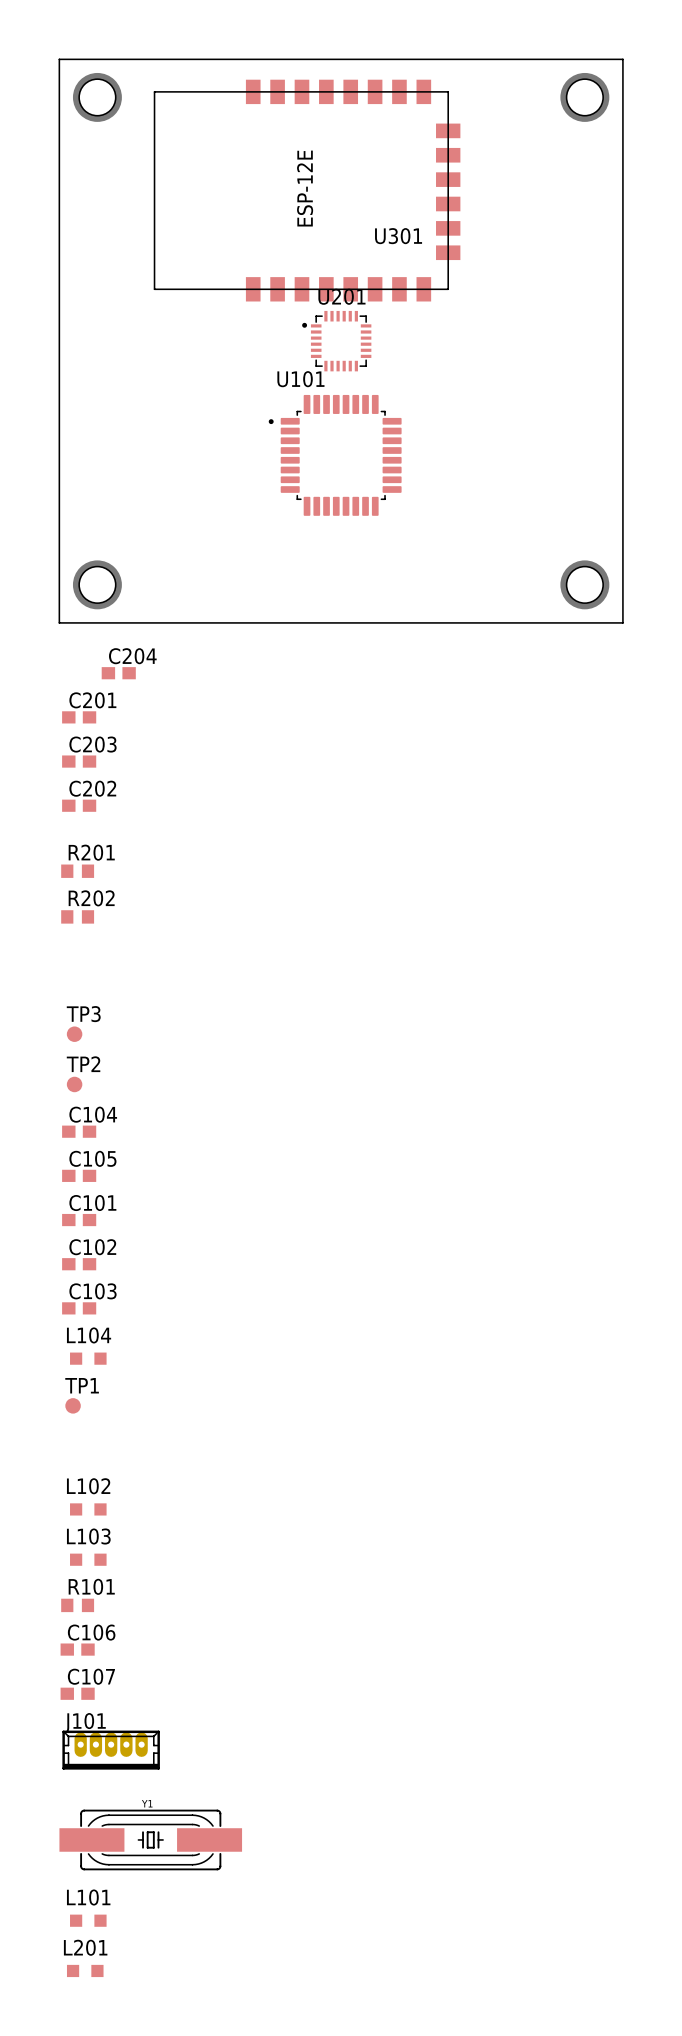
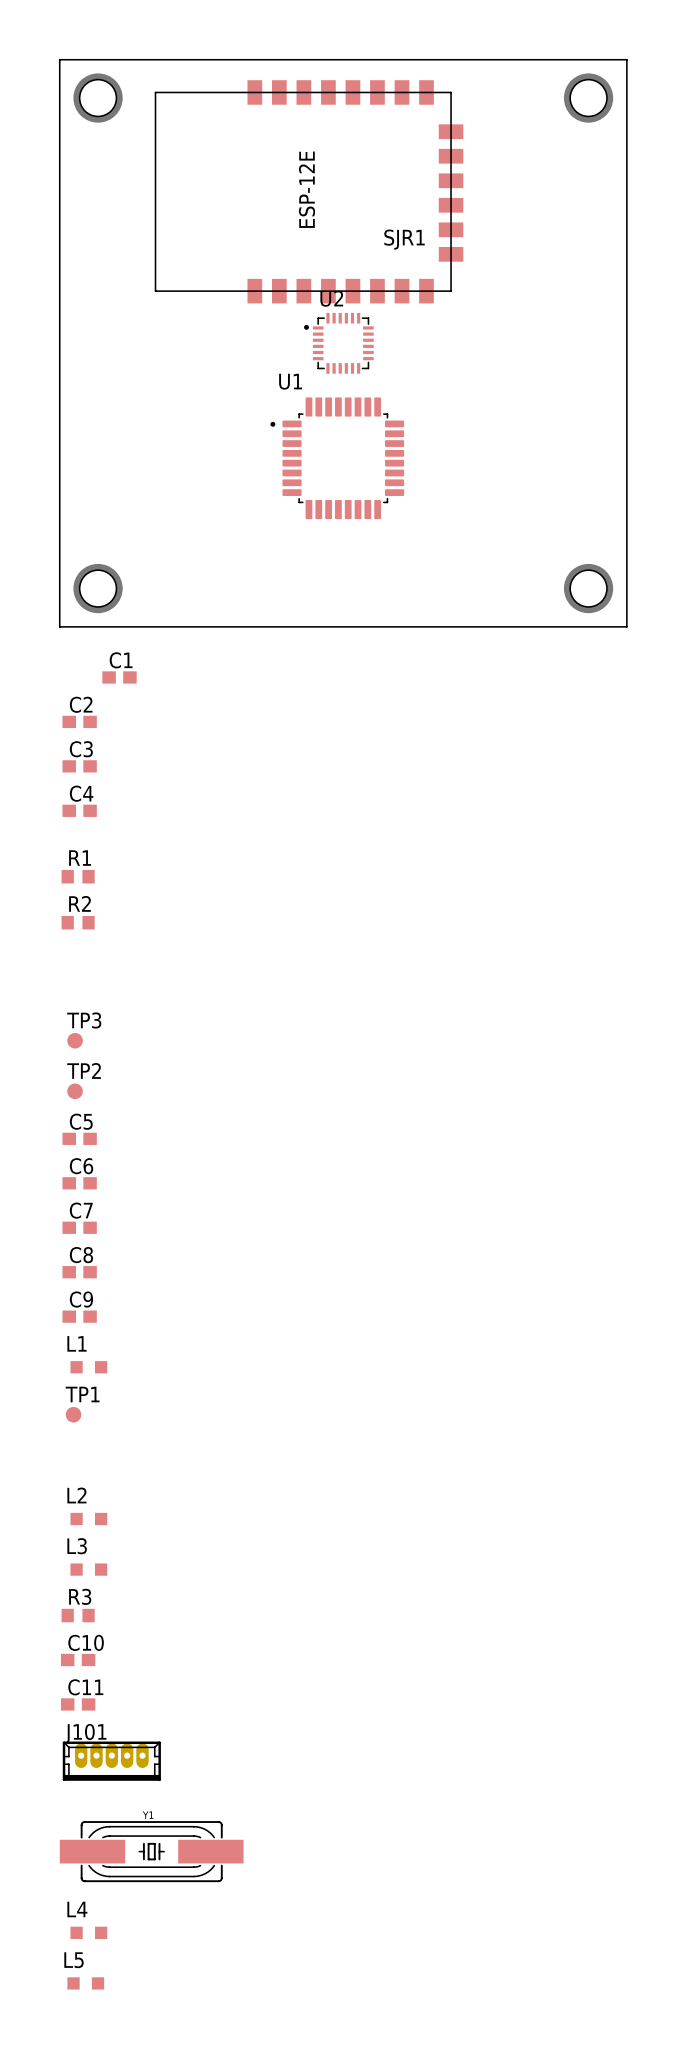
U301 name: U301 (398, 236) -> SJR1 (404, 239)
U201 name: U201 (341, 296) -> U2 (331, 298)
U101 name: U101 (300, 379) -> U1 (290, 381)
C204 name: C204 (132, 656) -> C1 (121, 660)
C201 name: C201 (92, 700) -> C2 (81, 704)
C203 name: C203 (92, 744) -> C3 (81, 749)
C202 name: C202 (92, 788) -> C4 (81, 793)
R201 name: R201 (91, 852) -> R1 (80, 858)
R202 name: R202 (91, 898) -> R2 (80, 903)
C104 name: C104 (93, 1114) -> C5 (81, 1121)
C105 name: C105 (92, 1158) -> C6 (81, 1166)
C101 name: C101 (92, 1203) -> C7 (81, 1210)
C102 name: C102 (92, 1247) -> C8 (81, 1255)
C103 name: C103 (92, 1291) -> C9 (81, 1299)
L104 name: L104 (89, 1335) -> L1 (77, 1343)
L102 name: L102 (88, 1486) -> L2 (76, 1495)
L103 name: L103 (88, 1536) -> L3 (77, 1546)
R101 name: R101 (91, 1586) -> R3 (80, 1596)
C106 name: C106 (91, 1632) -> C10 (86, 1642)
C107 name: C107 (91, 1676) -> C11 (85, 1687)
L101 name: L101 (88, 1897) -> L4 (77, 1909)
L201 name: L201 (85, 1947) -> L5 (74, 1960)

